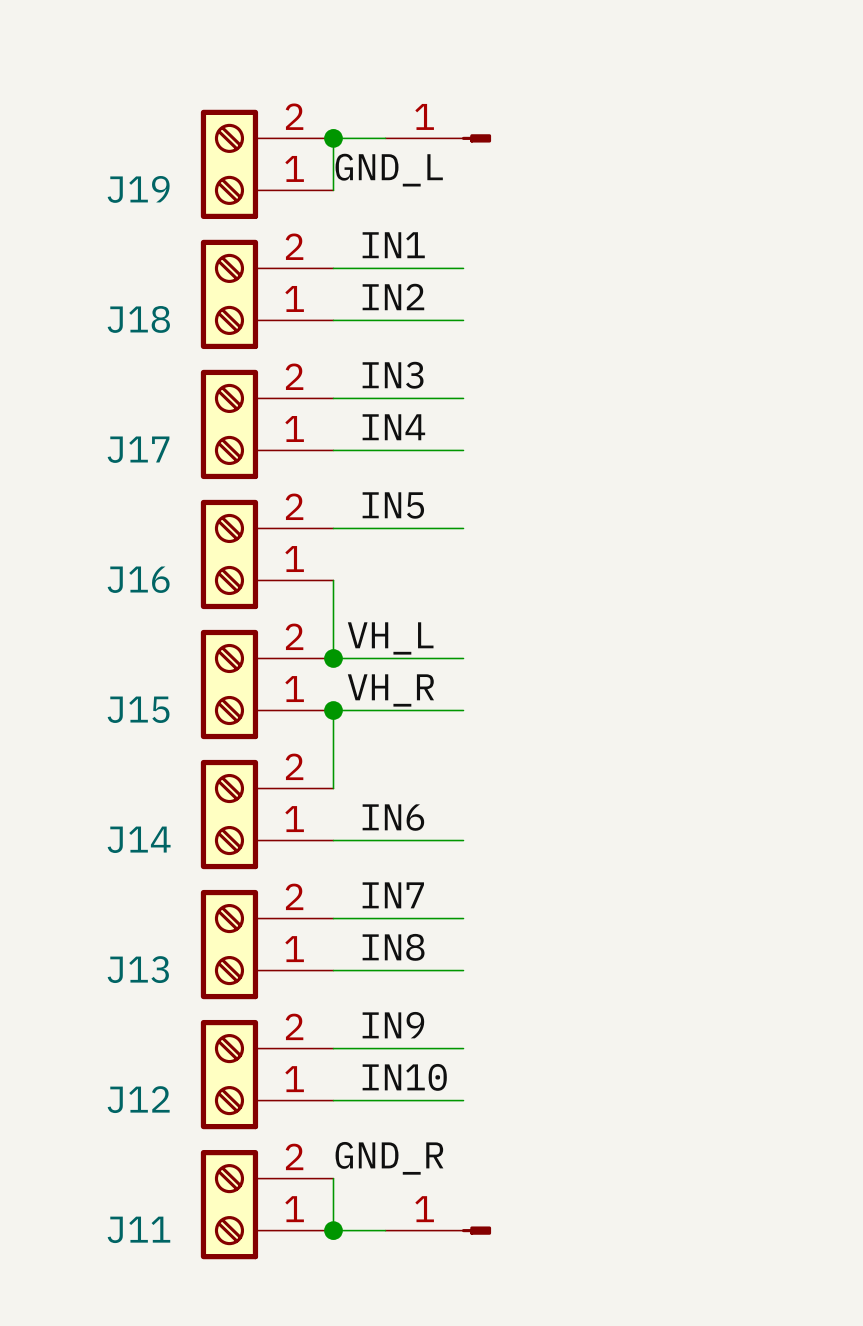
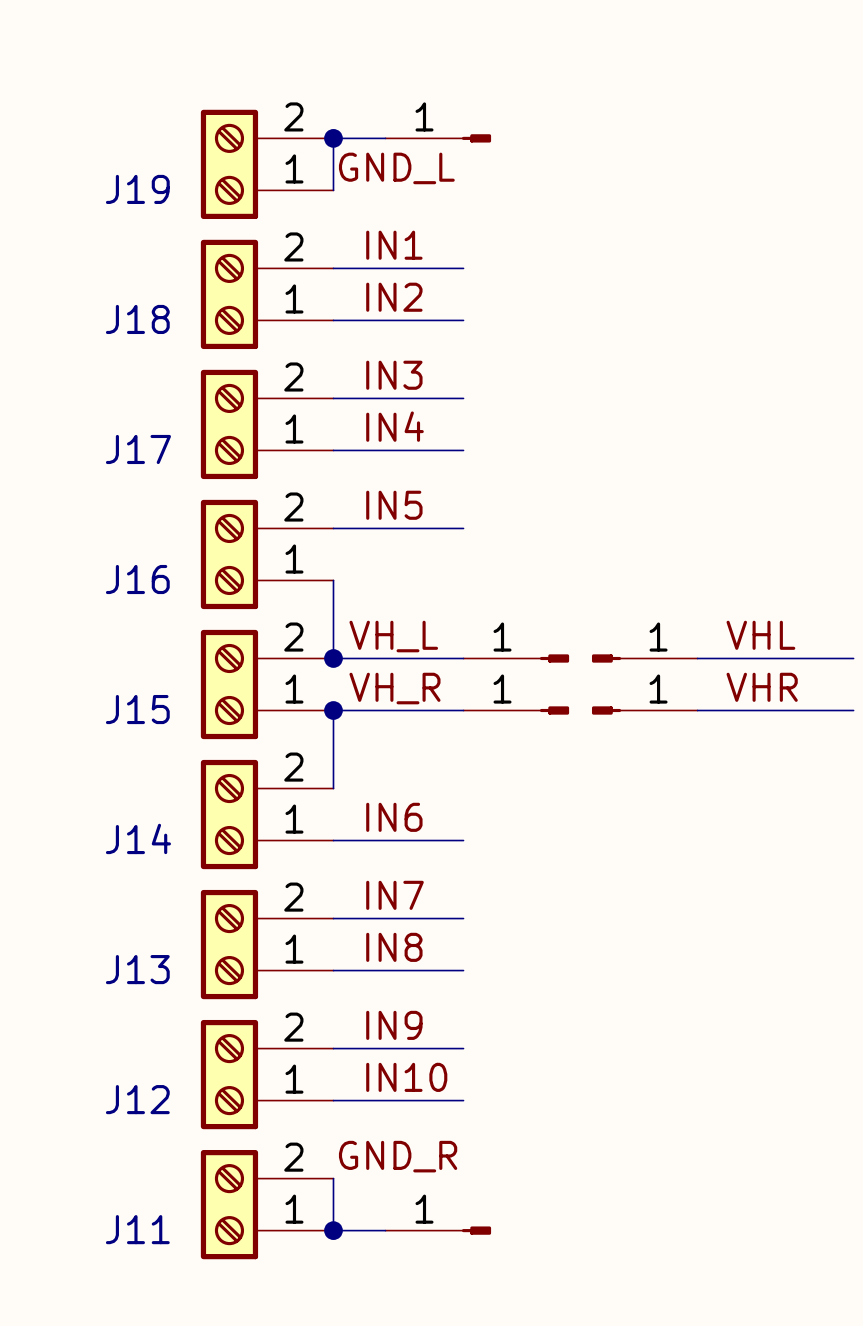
label: none -> VHL (760, 635)
part: none -> (516, 658)
part: none -> (644, 658)
wire: none -> (697, 658) (853, 658)
label: none -> VHR (762, 687)
part: none -> (516, 710)
part: none -> (644, 710)
wire: none -> (697, 710) (853, 710)

